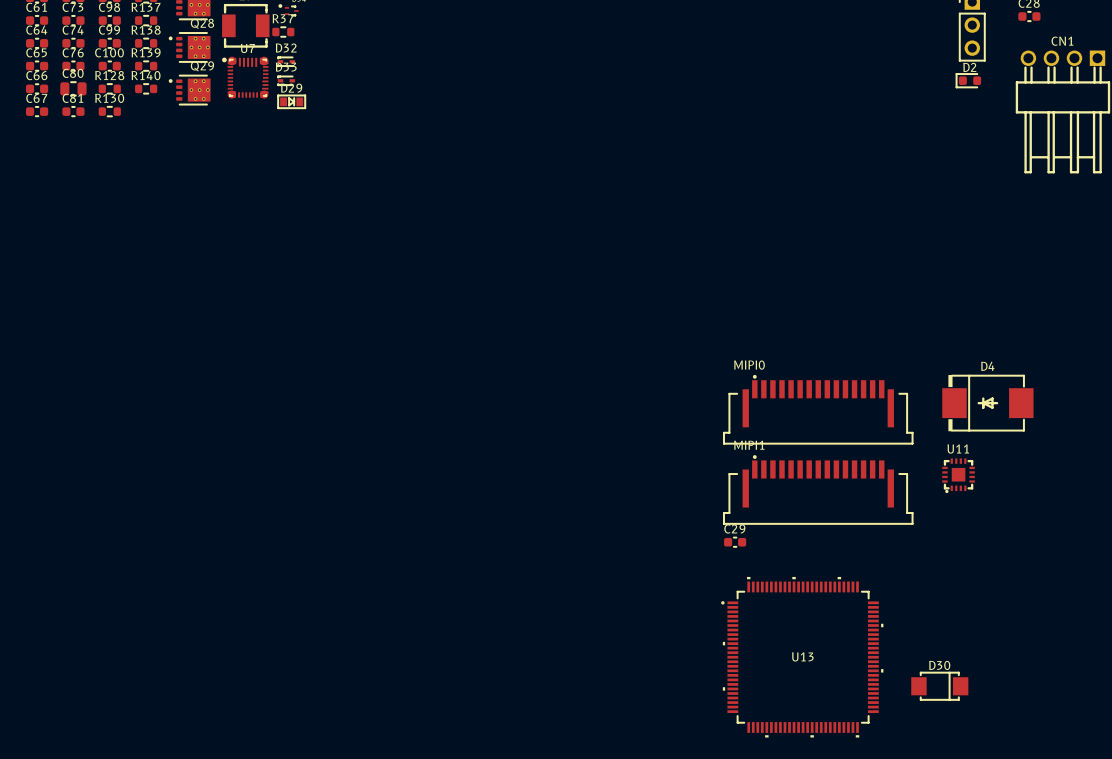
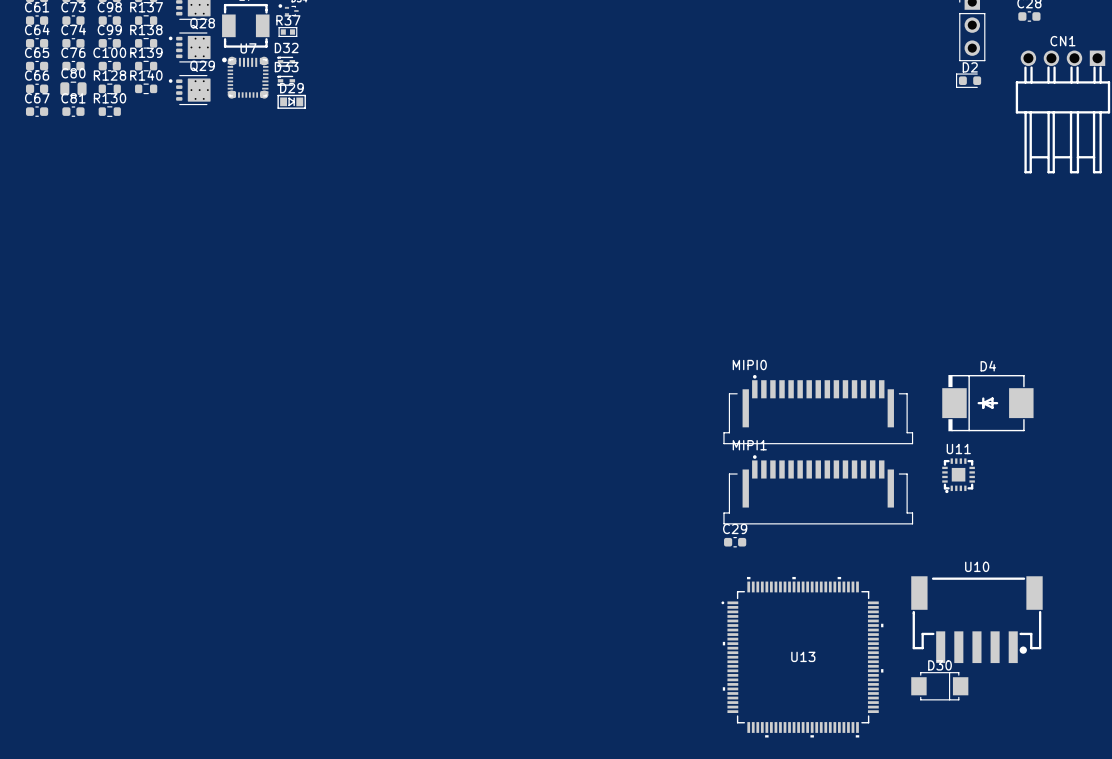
R37 footprint: [272, 26, 295, 38] -> [278, 27, 298, 37]
U10: none -> (976, 619)

